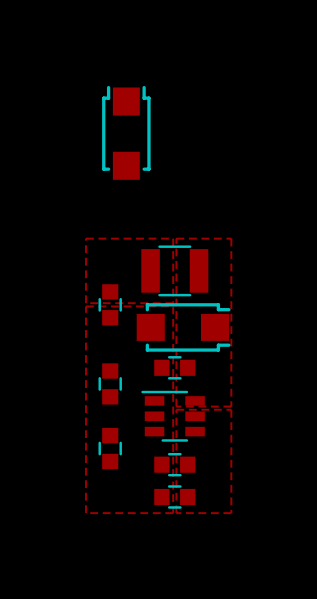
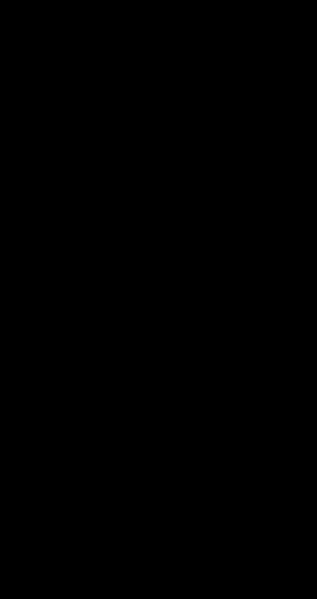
part: (126, 132) -> none
top zone outline: (85, 238) (173, 238) (173, 303) (85, 303) (85, 238) -> none
top zone outline: (176, 238) (176, 406) (231, 406) (231, 238) (176, 238) -> none
part: (174, 270) -> none
part: (110, 304) -> none
top zone outline: (85, 306) (85, 513) (173, 513) (173, 306) (85, 306) -> none
part: (183, 327) -> none
part: (174, 367) -> none
part: (110, 383) -> none
top zone outline: (176, 409) (176, 513) (231, 513) (231, 409) (176, 409) -> none
part: (173, 416) -> none
part: (110, 448) -> none
part: (174, 464) -> none
part: (174, 496) -> none

